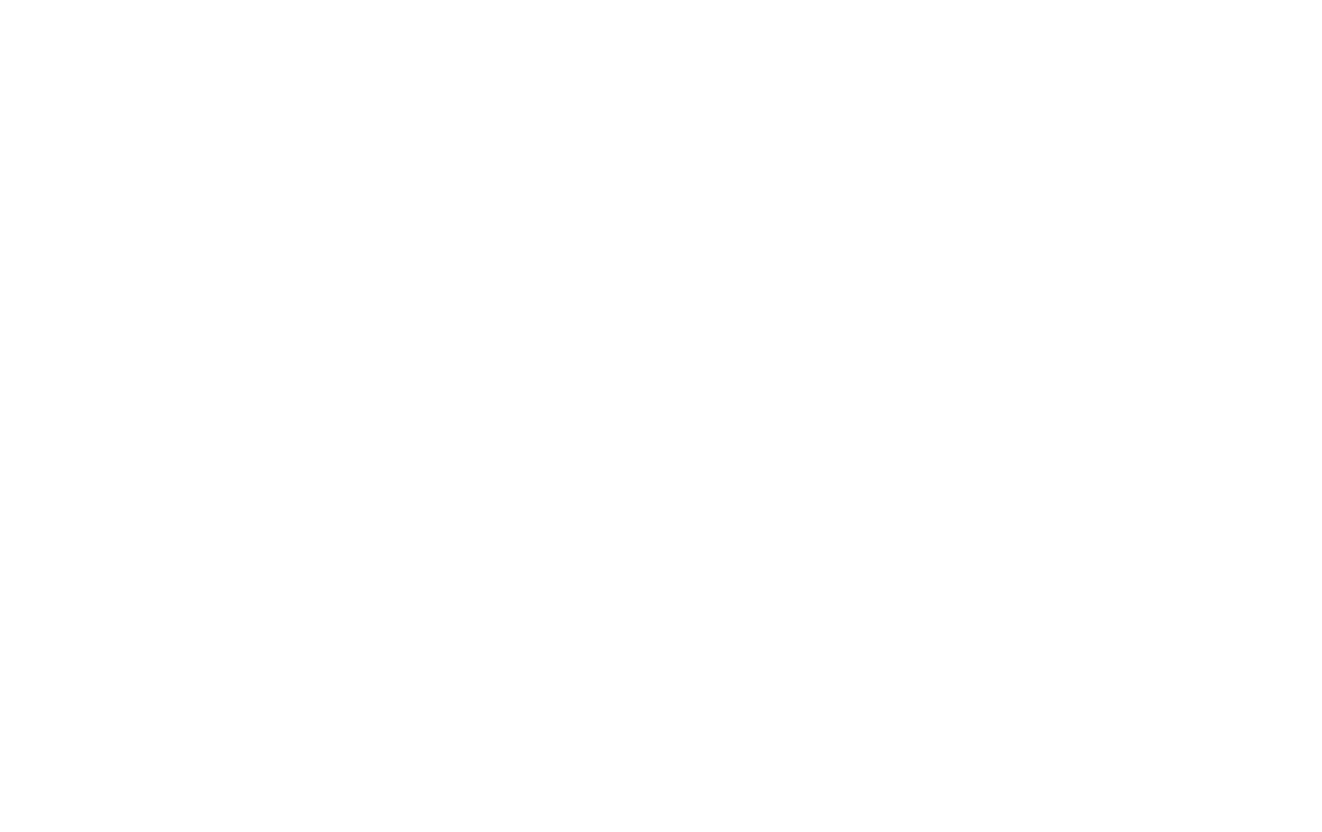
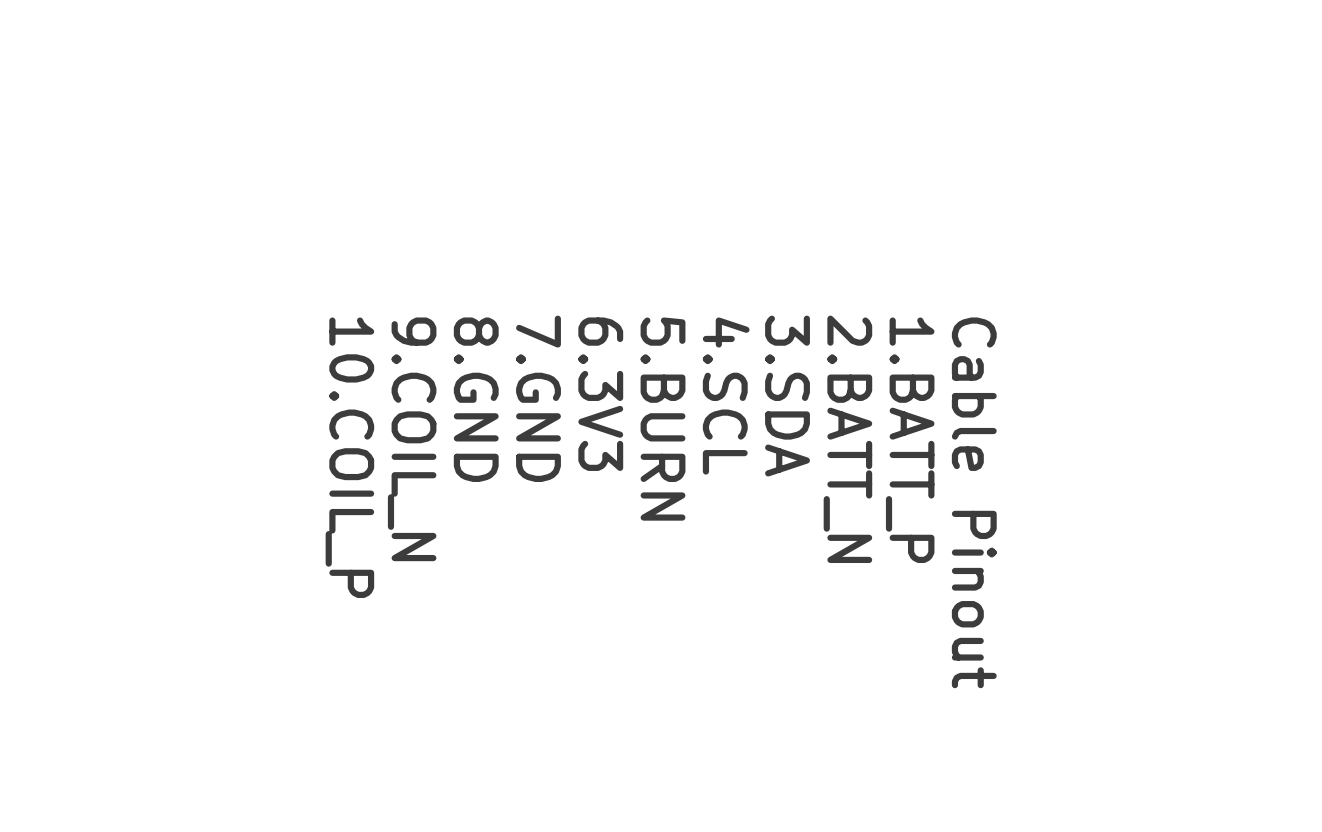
text: none -> 6.3V3 (600, 394)
text: none -> 4.SCL (726, 396)
text: none -> 3.SDA (787, 396)
text: none -> 7.GND (538, 398)
text: none -> 8.GND (476, 399)
text: none -> 5.BURN (663, 419)
text: none -> 9.COIL_N (412, 439)
text: none -> 2.BATT_N (847, 439)
text: none -> 1.BATT_P (910, 440)
text: none -> 10.COIL_P (349, 457)
text: none -> Cable Pinout (974, 502)

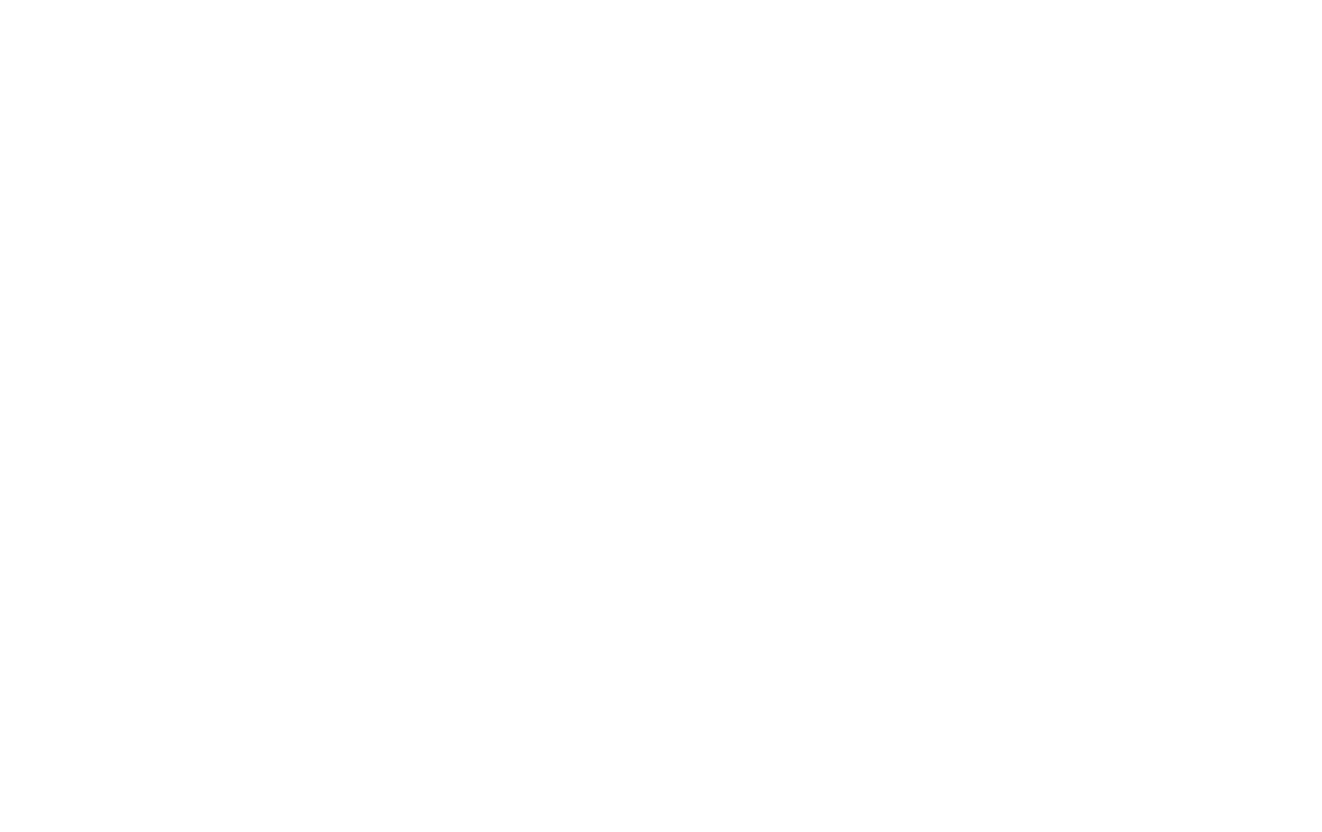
text: 6.3V3 (600, 394) -> none
text: 4.SCL (726, 396) -> none
text: 3.SDA (787, 396) -> none
text: 7.GND (538, 398) -> none
text: 8.GND (476, 399) -> none
text: 5.BURN (663, 419) -> none
text: 9.COIL_N (412, 439) -> none
text: 2.BATT_N (847, 439) -> none
text: 1.BATT_P (910, 440) -> none
text: 10.COIL_P (349, 457) -> none
text: Cable Pinout (974, 502) -> none

